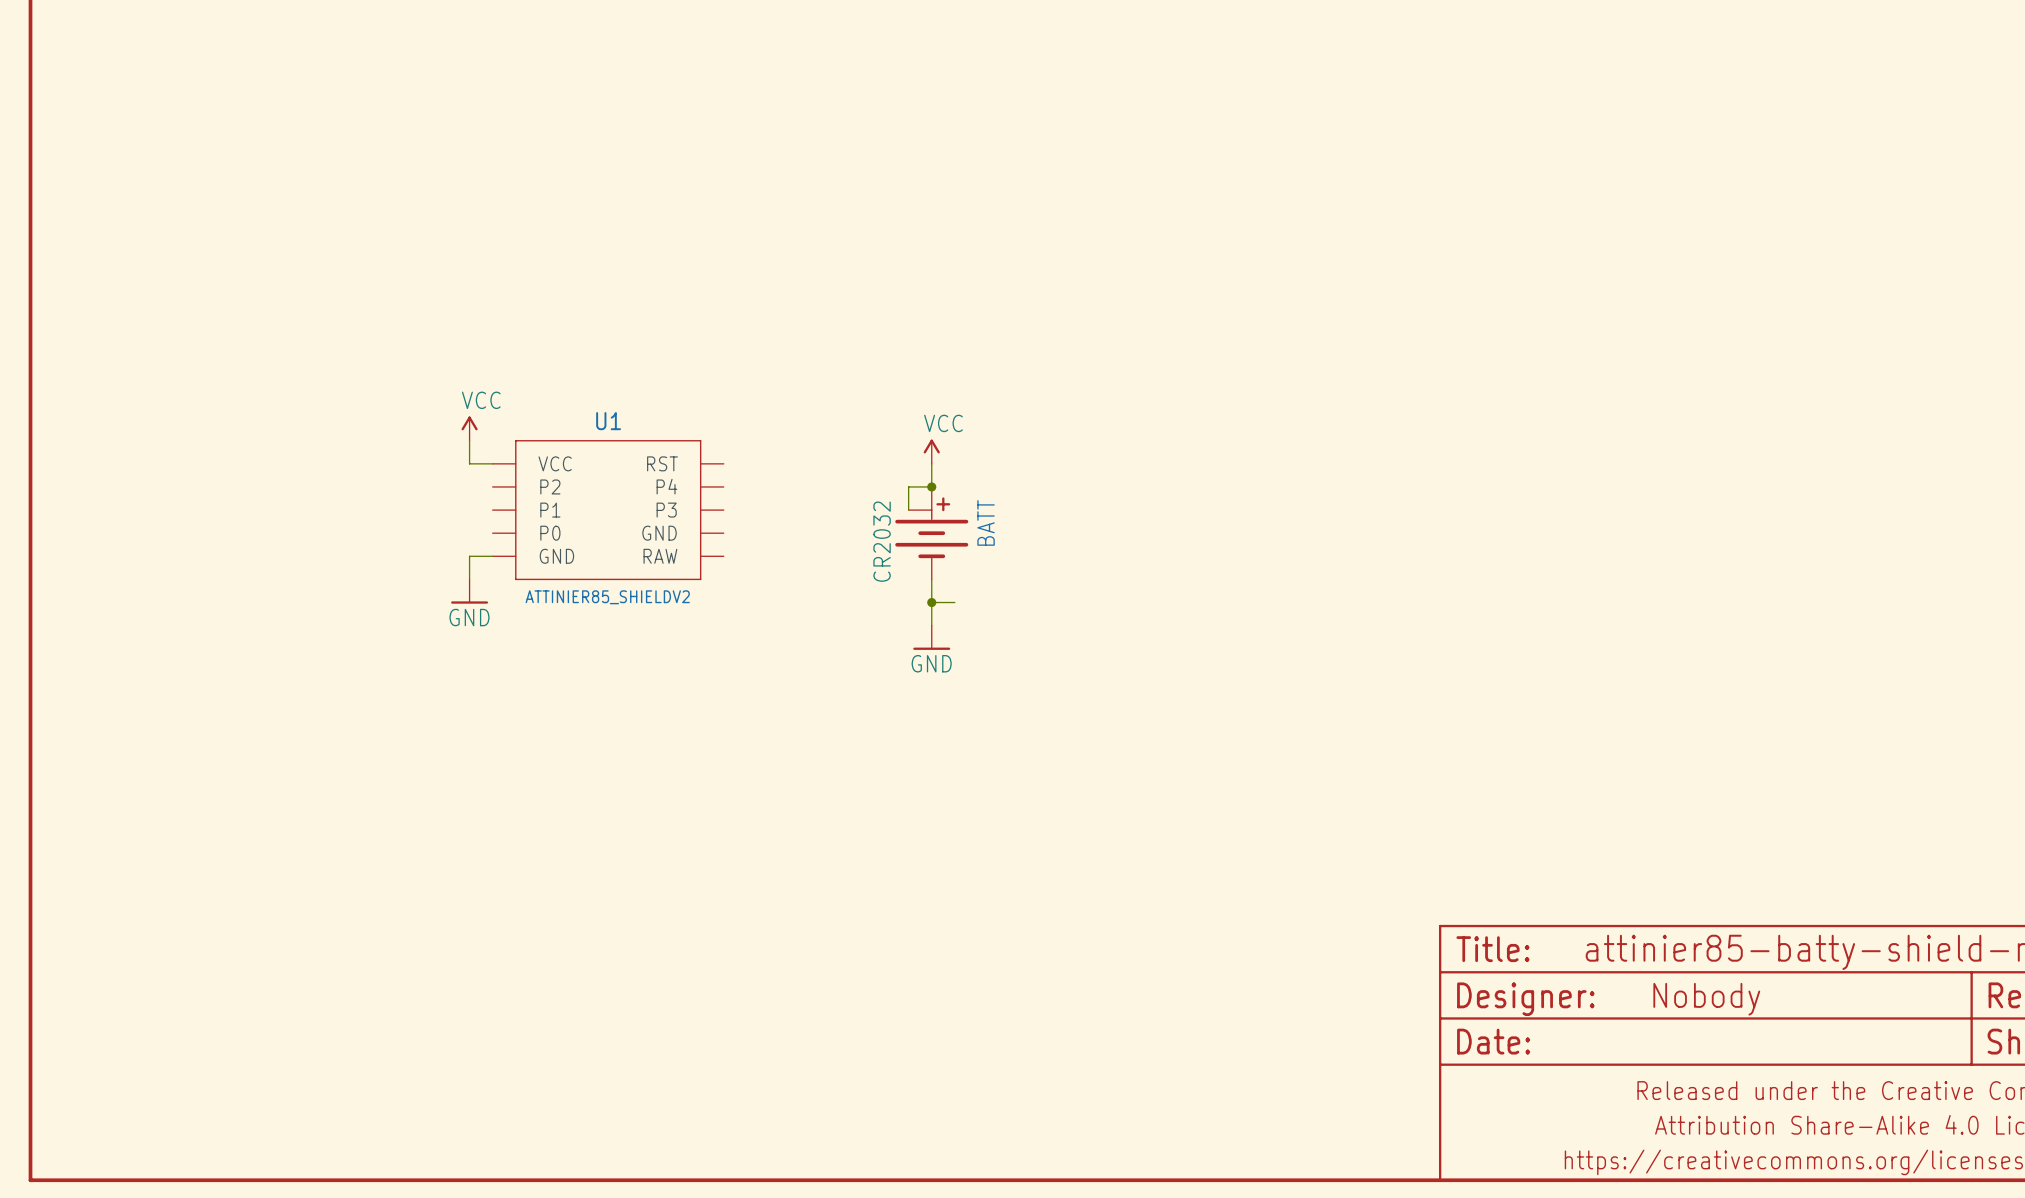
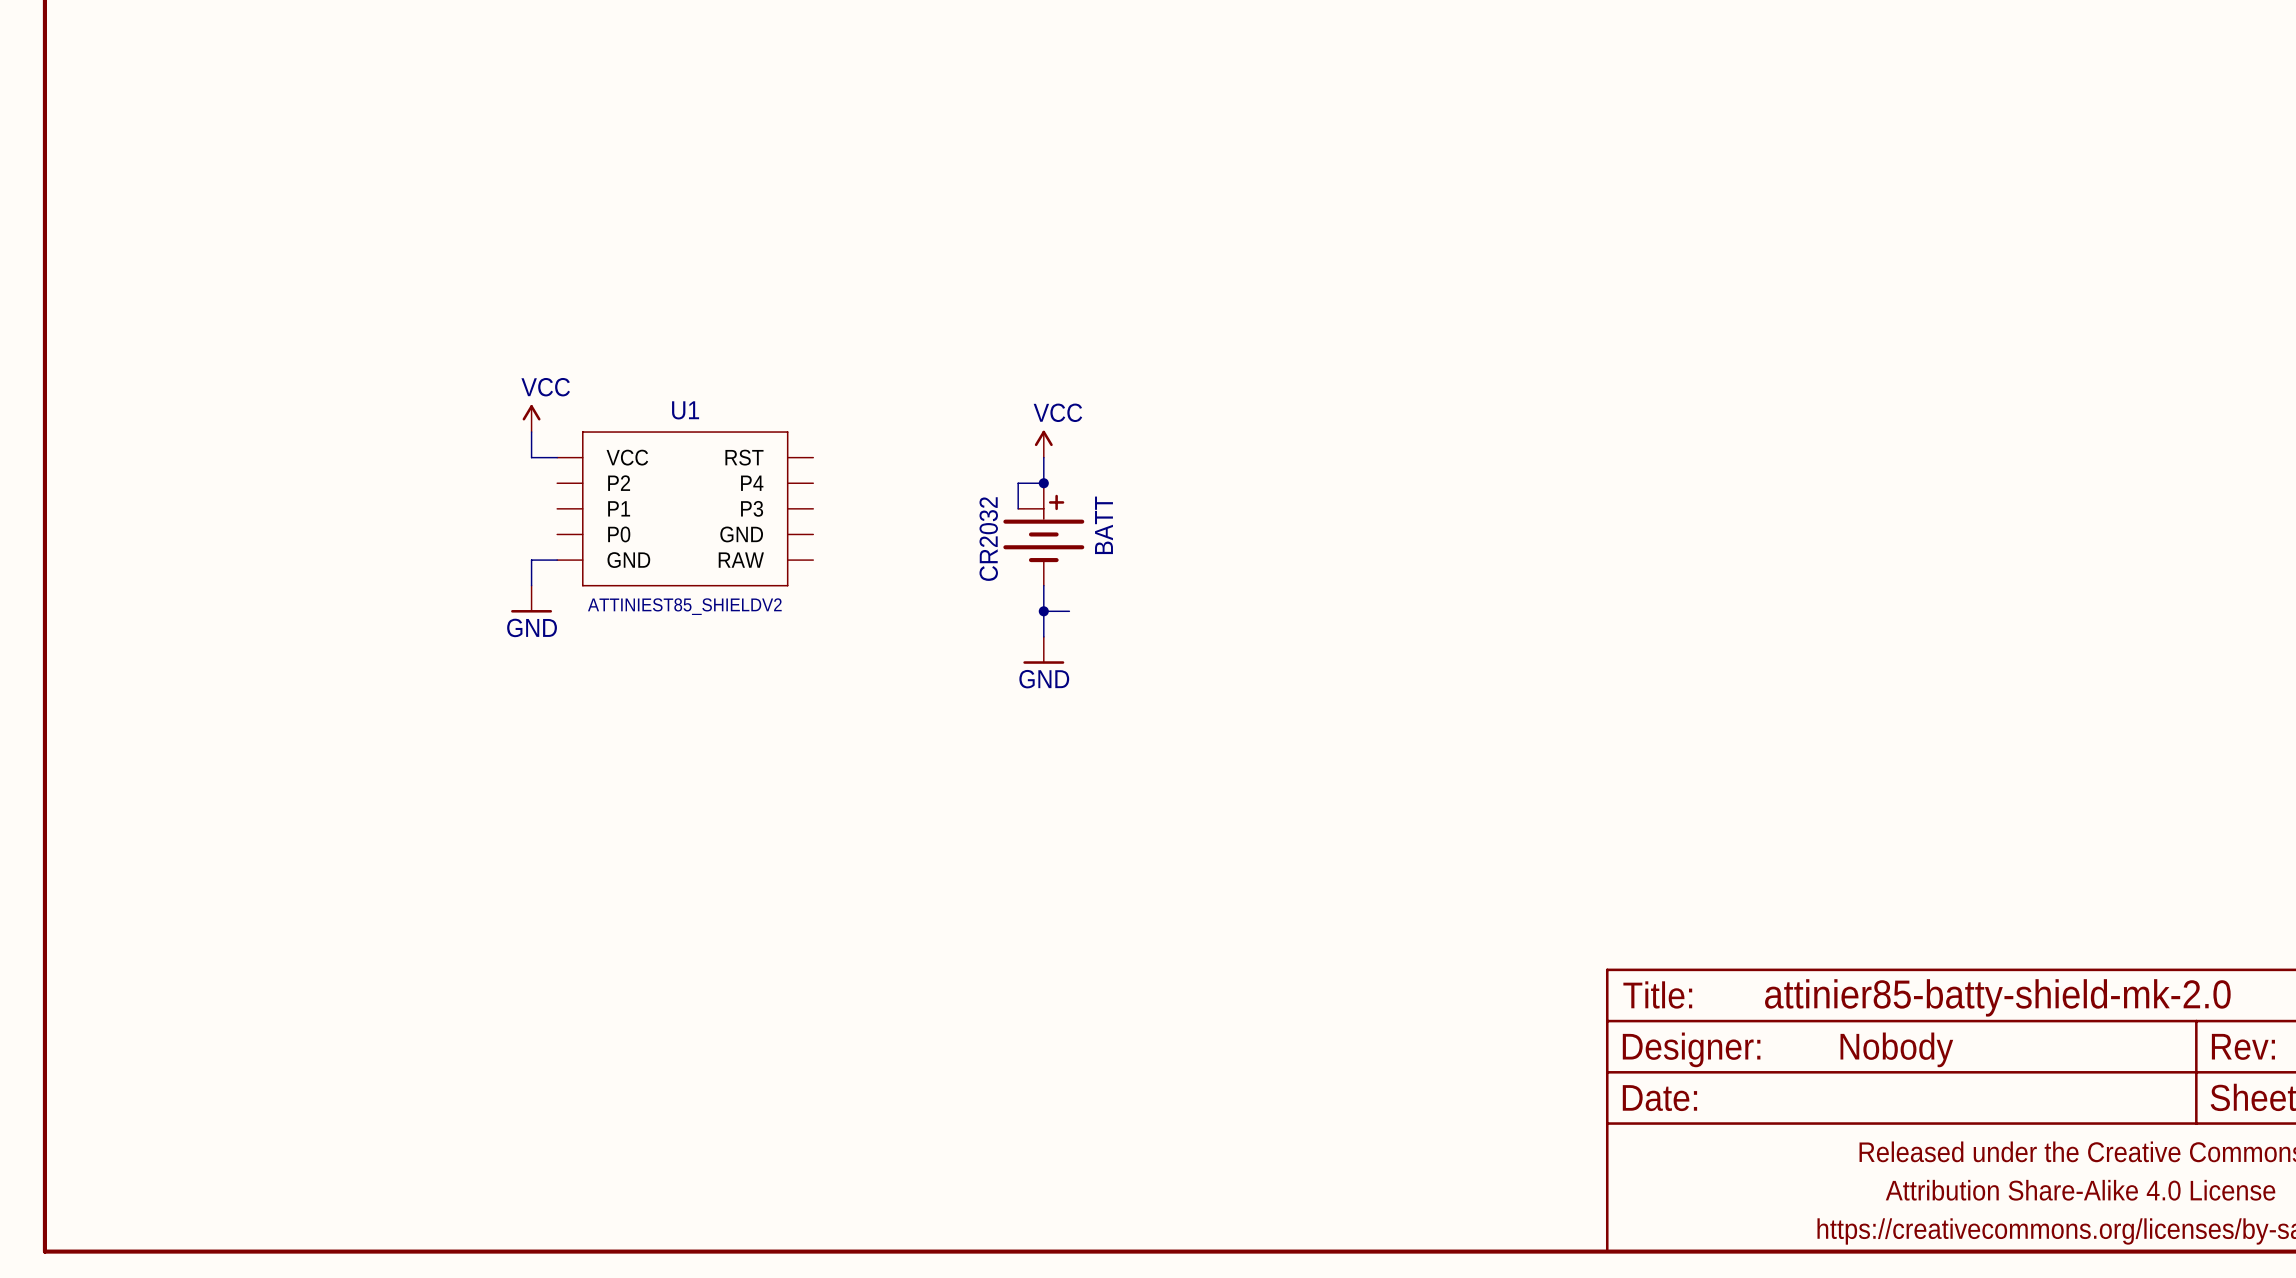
U1 value: ATTINIER85_SHIELDV2 (607, 597) -> ATTINIEST85_SHIELDV2 (684, 606)

